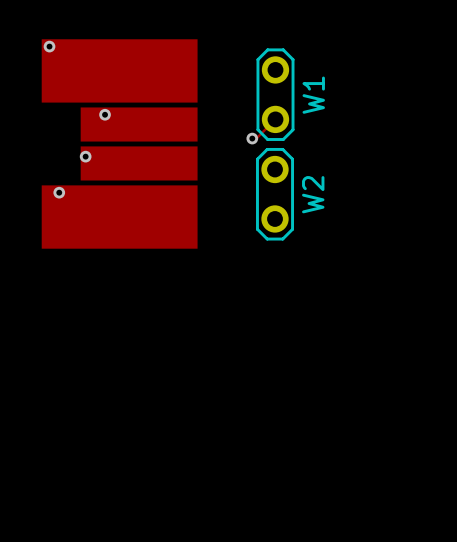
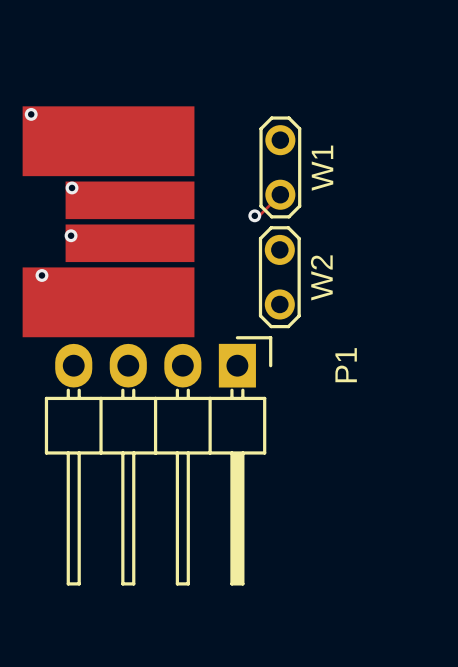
via position: (105, 114) -> (72, 187)
P1: none -> (158, 460)

